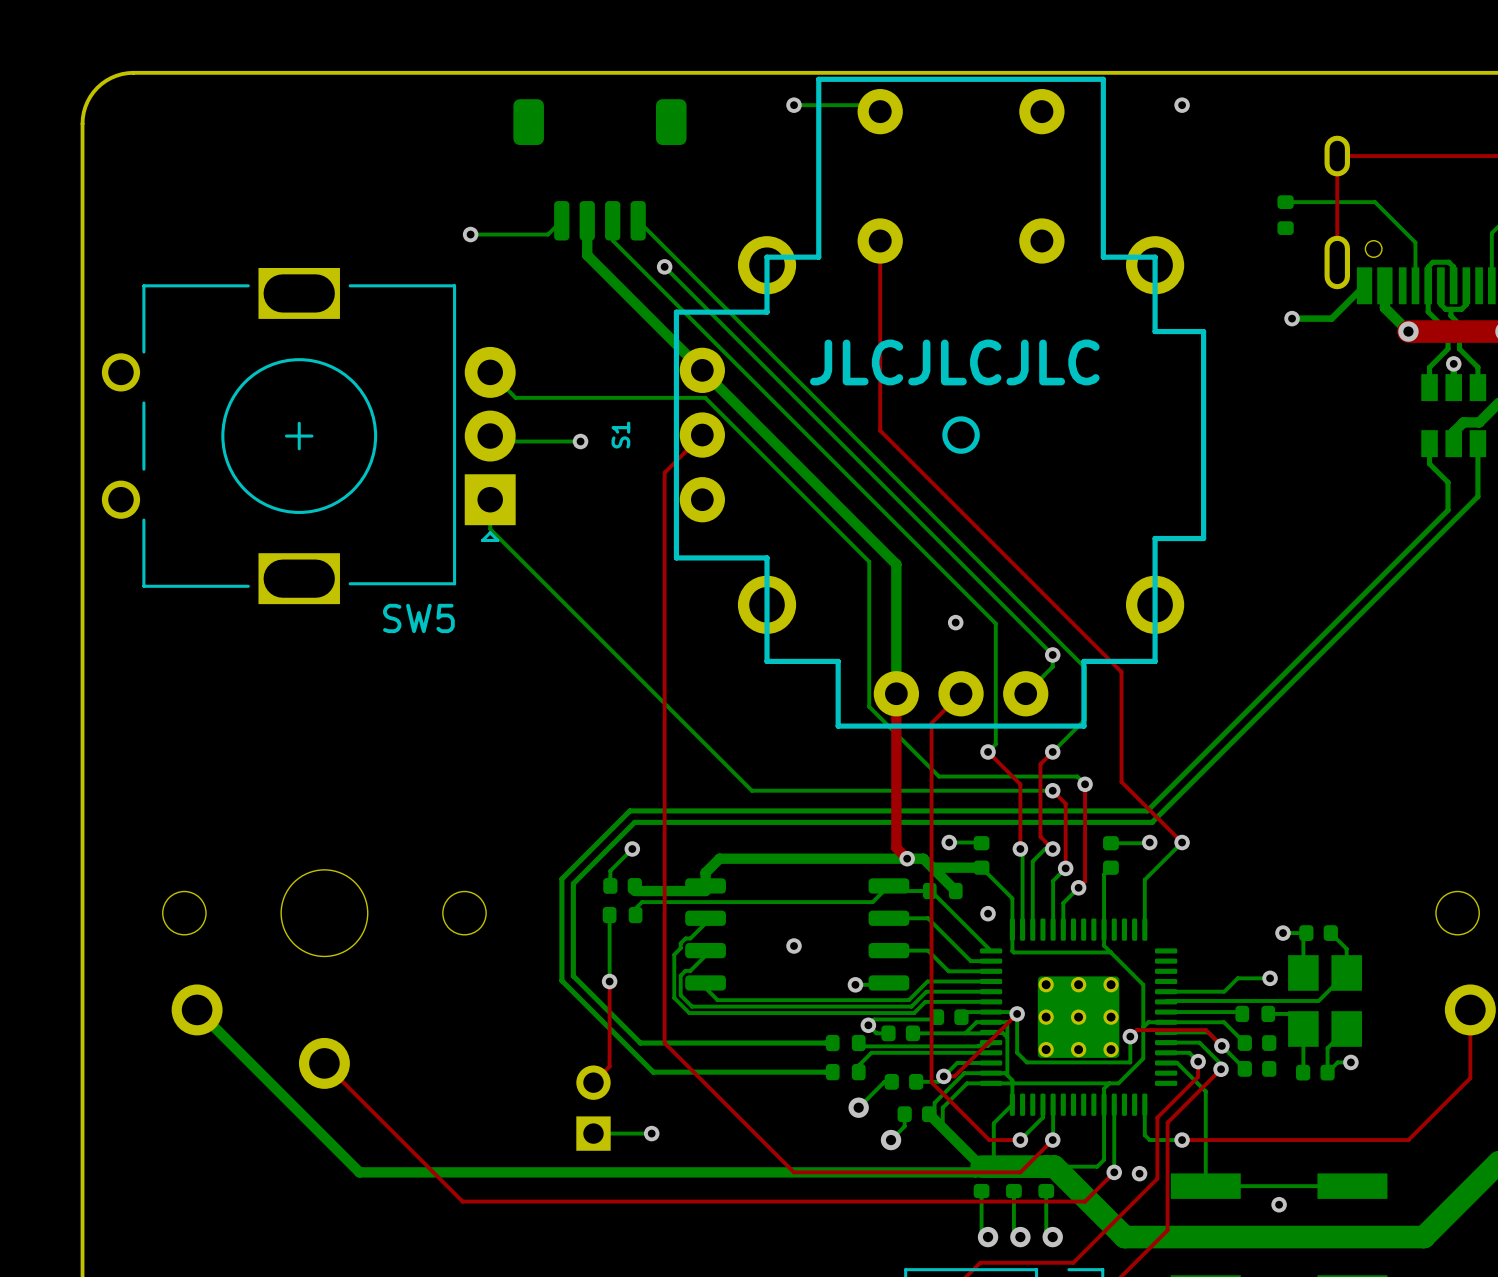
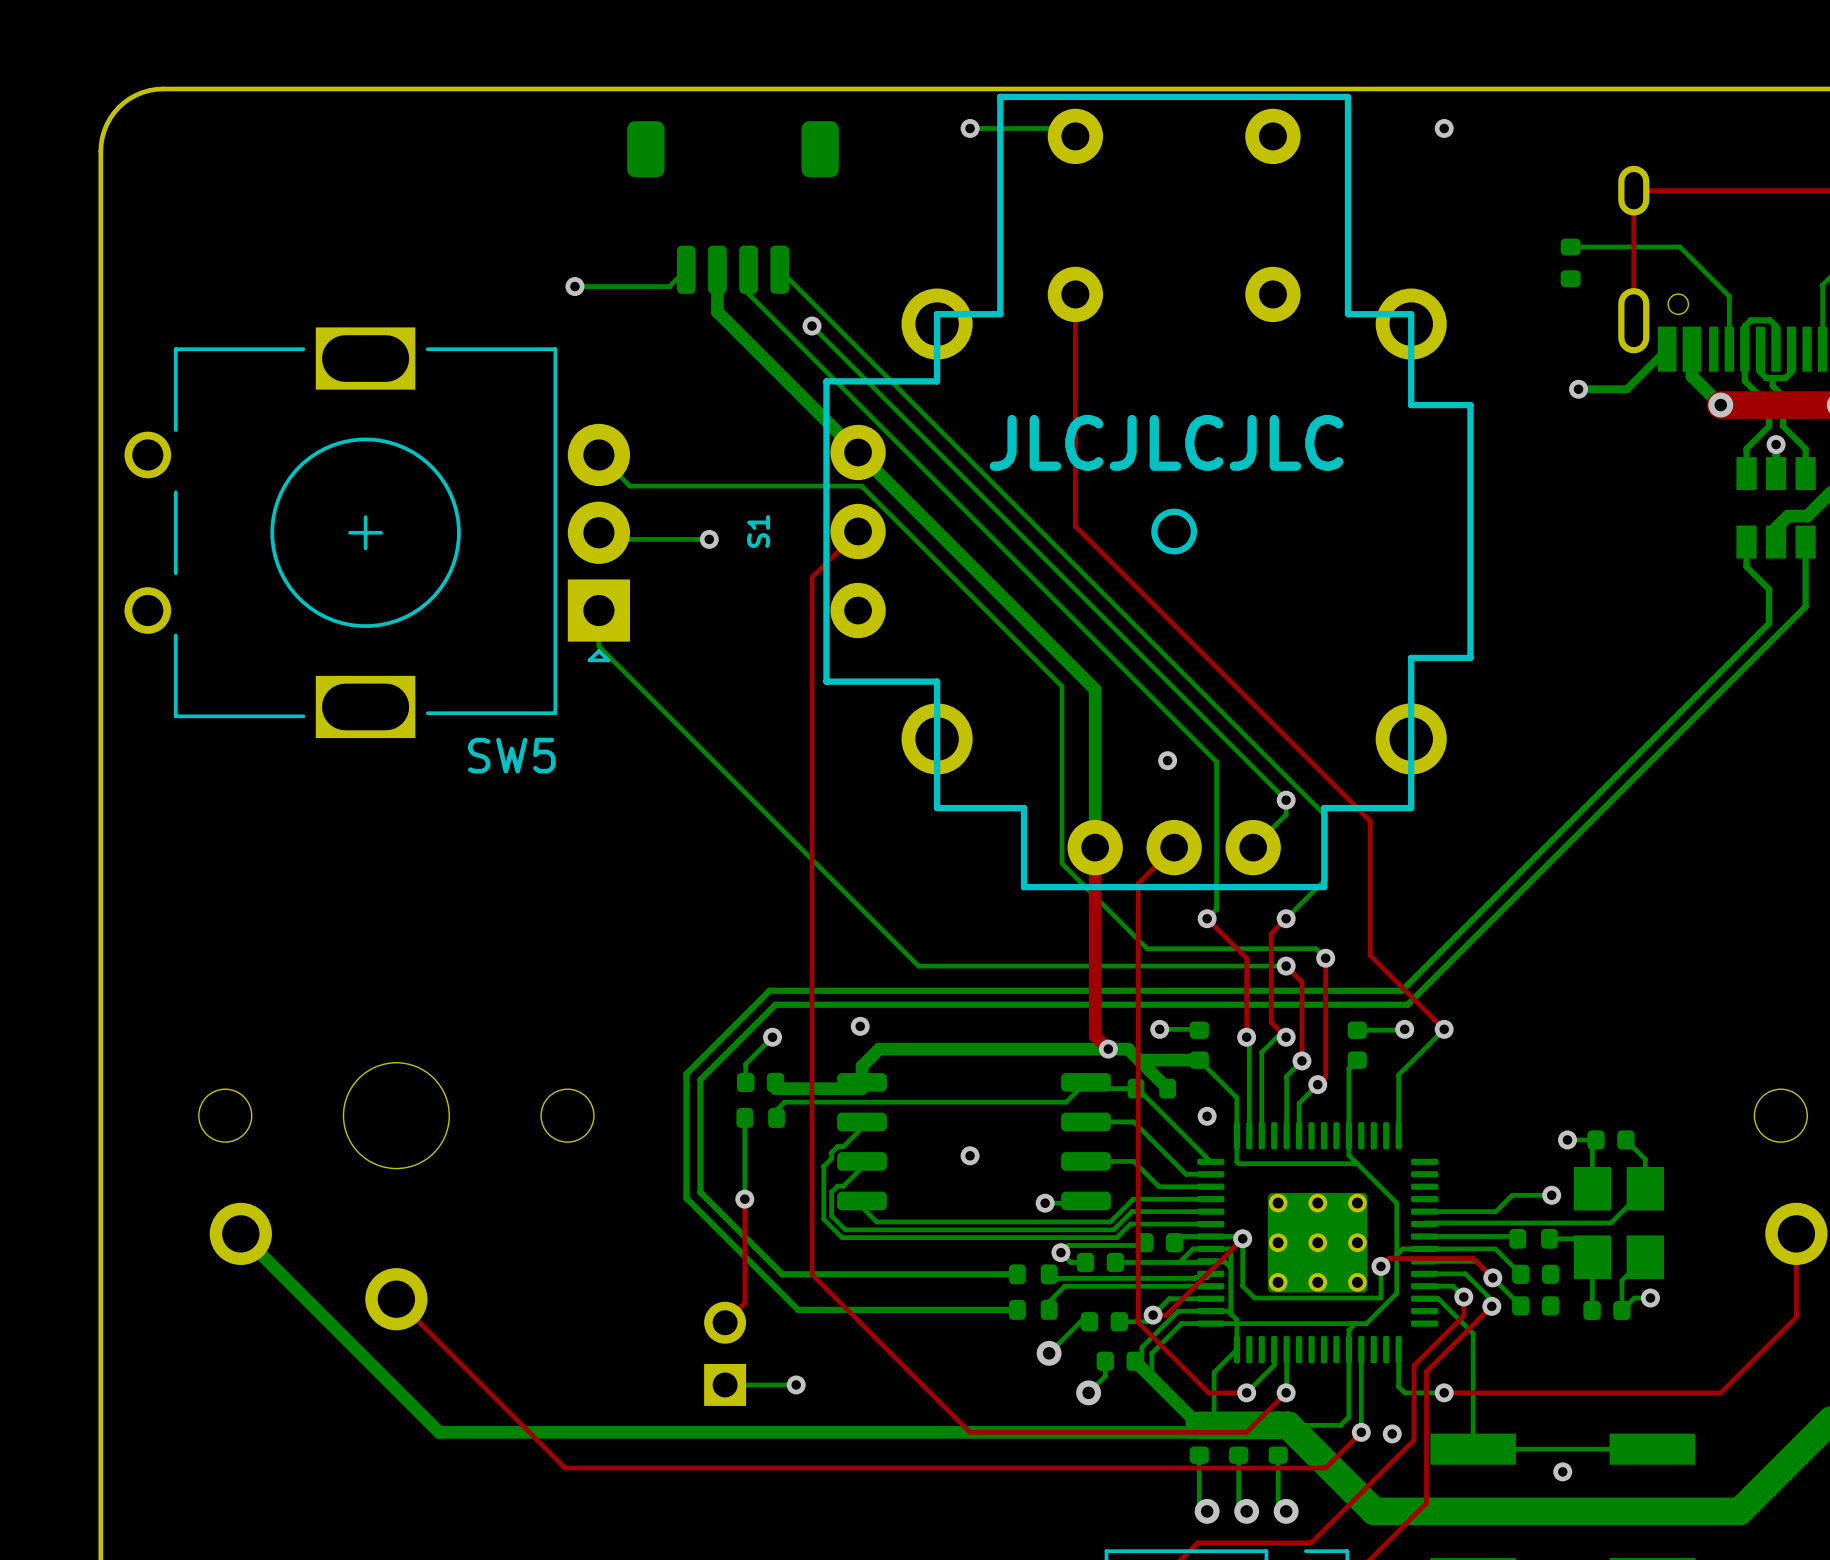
via: none -> (860, 1026)

